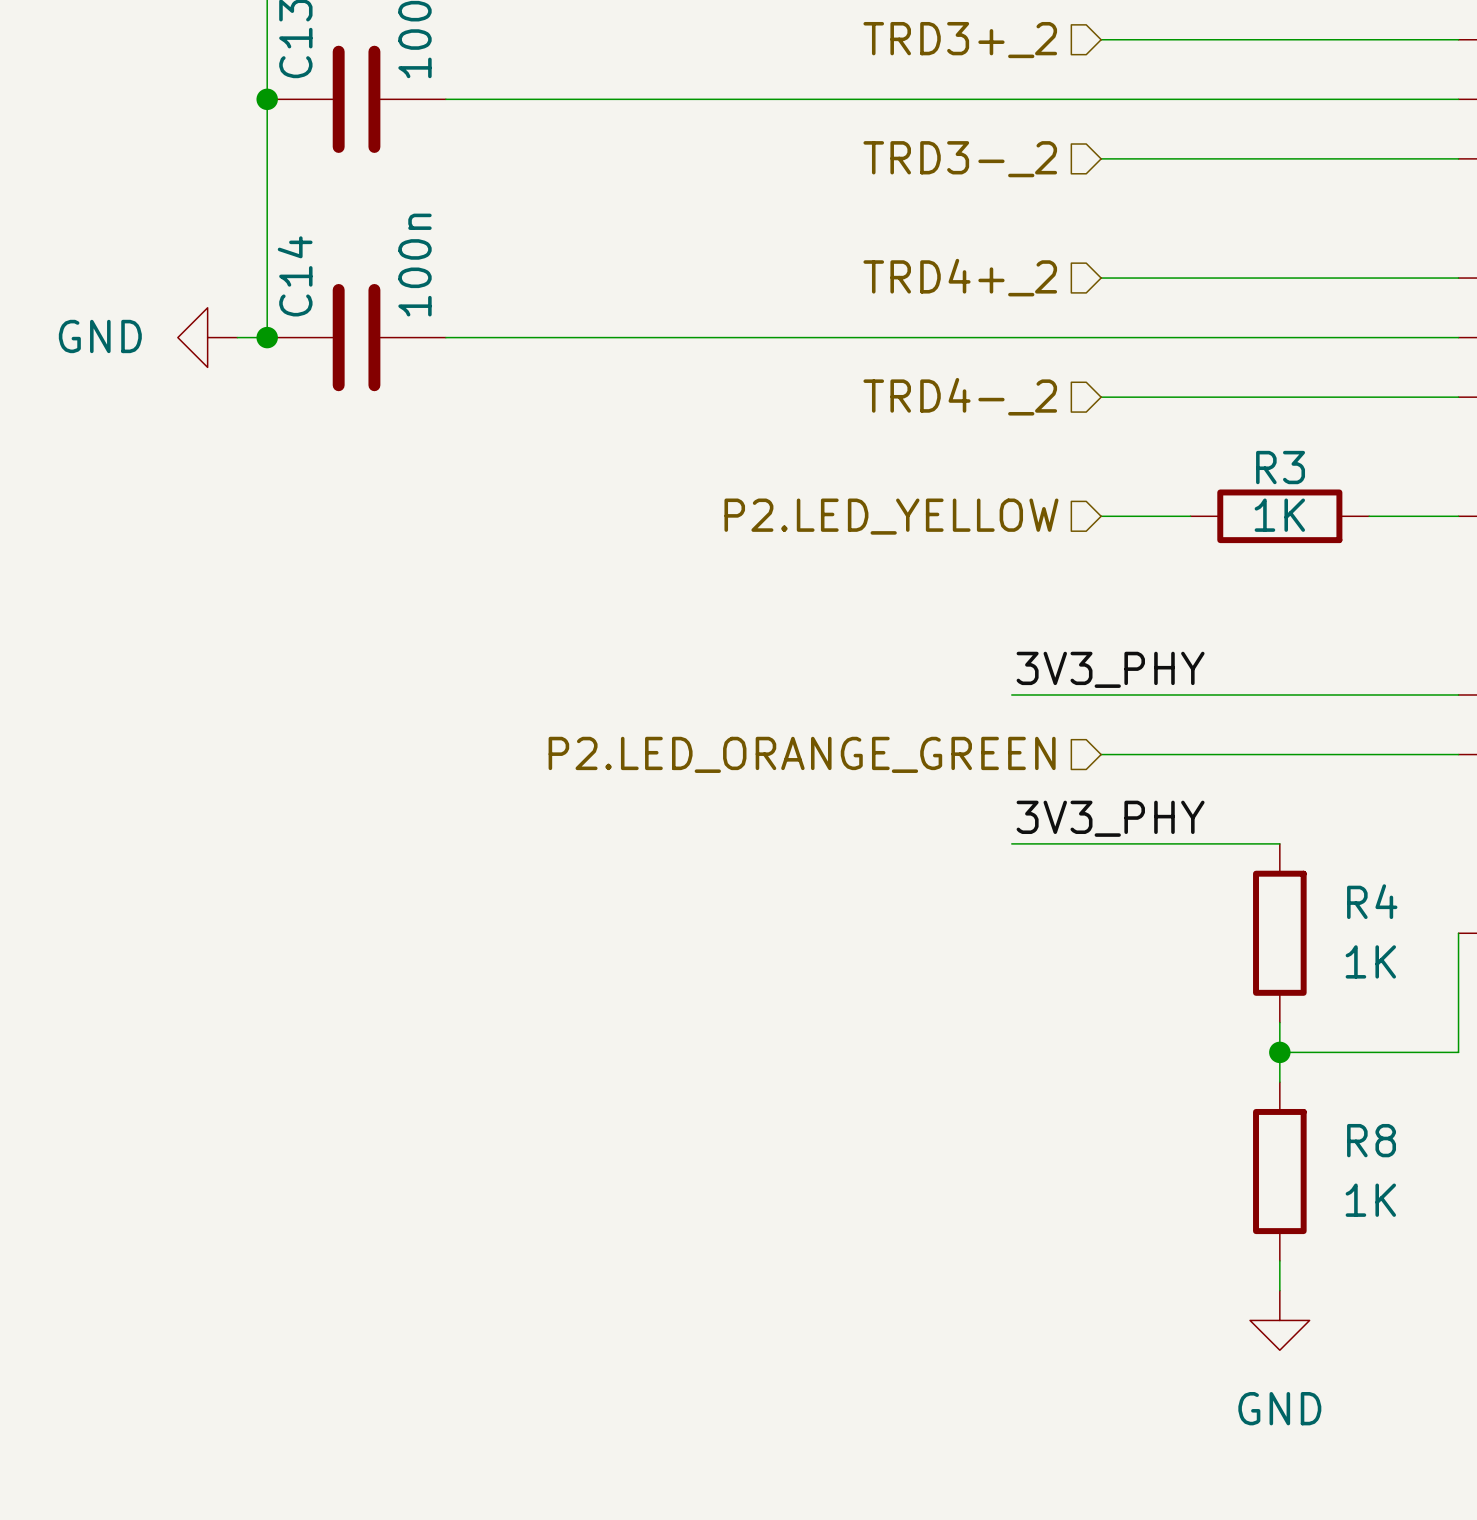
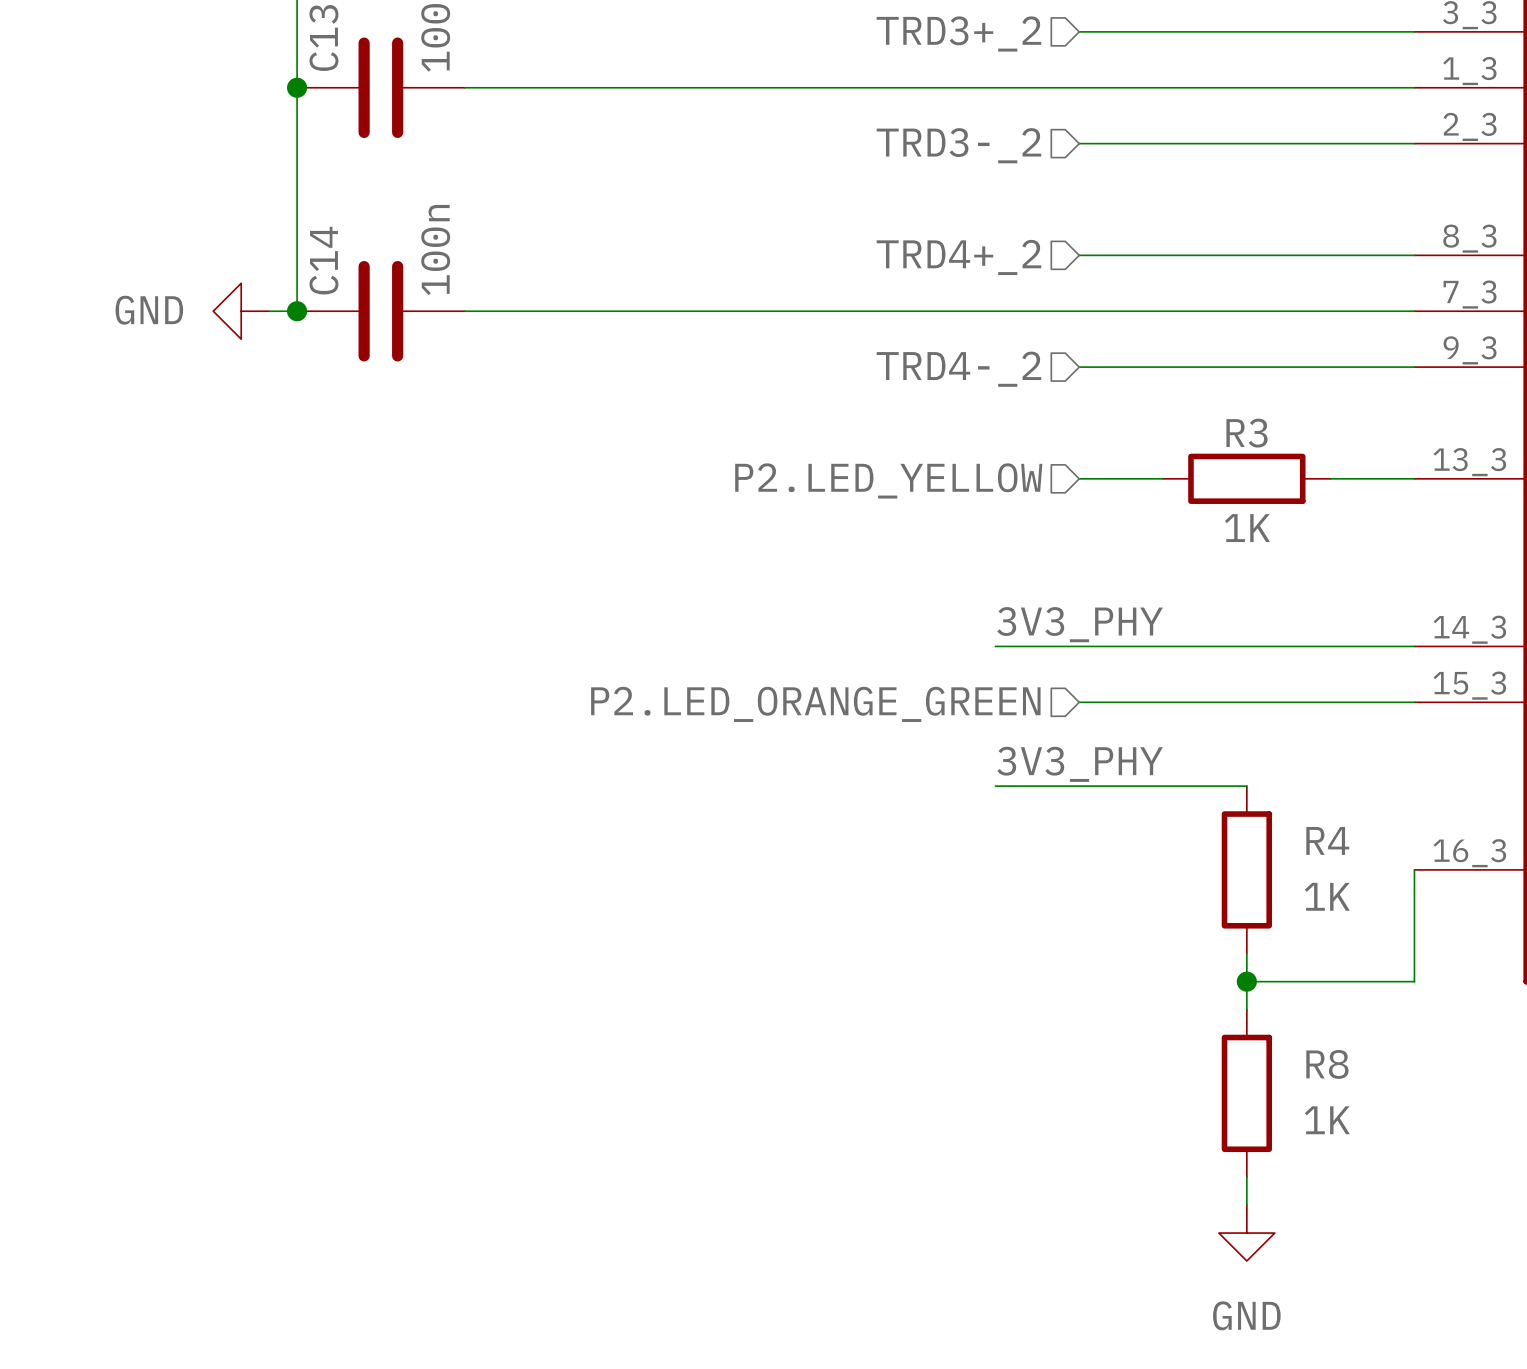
R3 value position: 1K (1279, 515) -> 1K (1247, 528)

